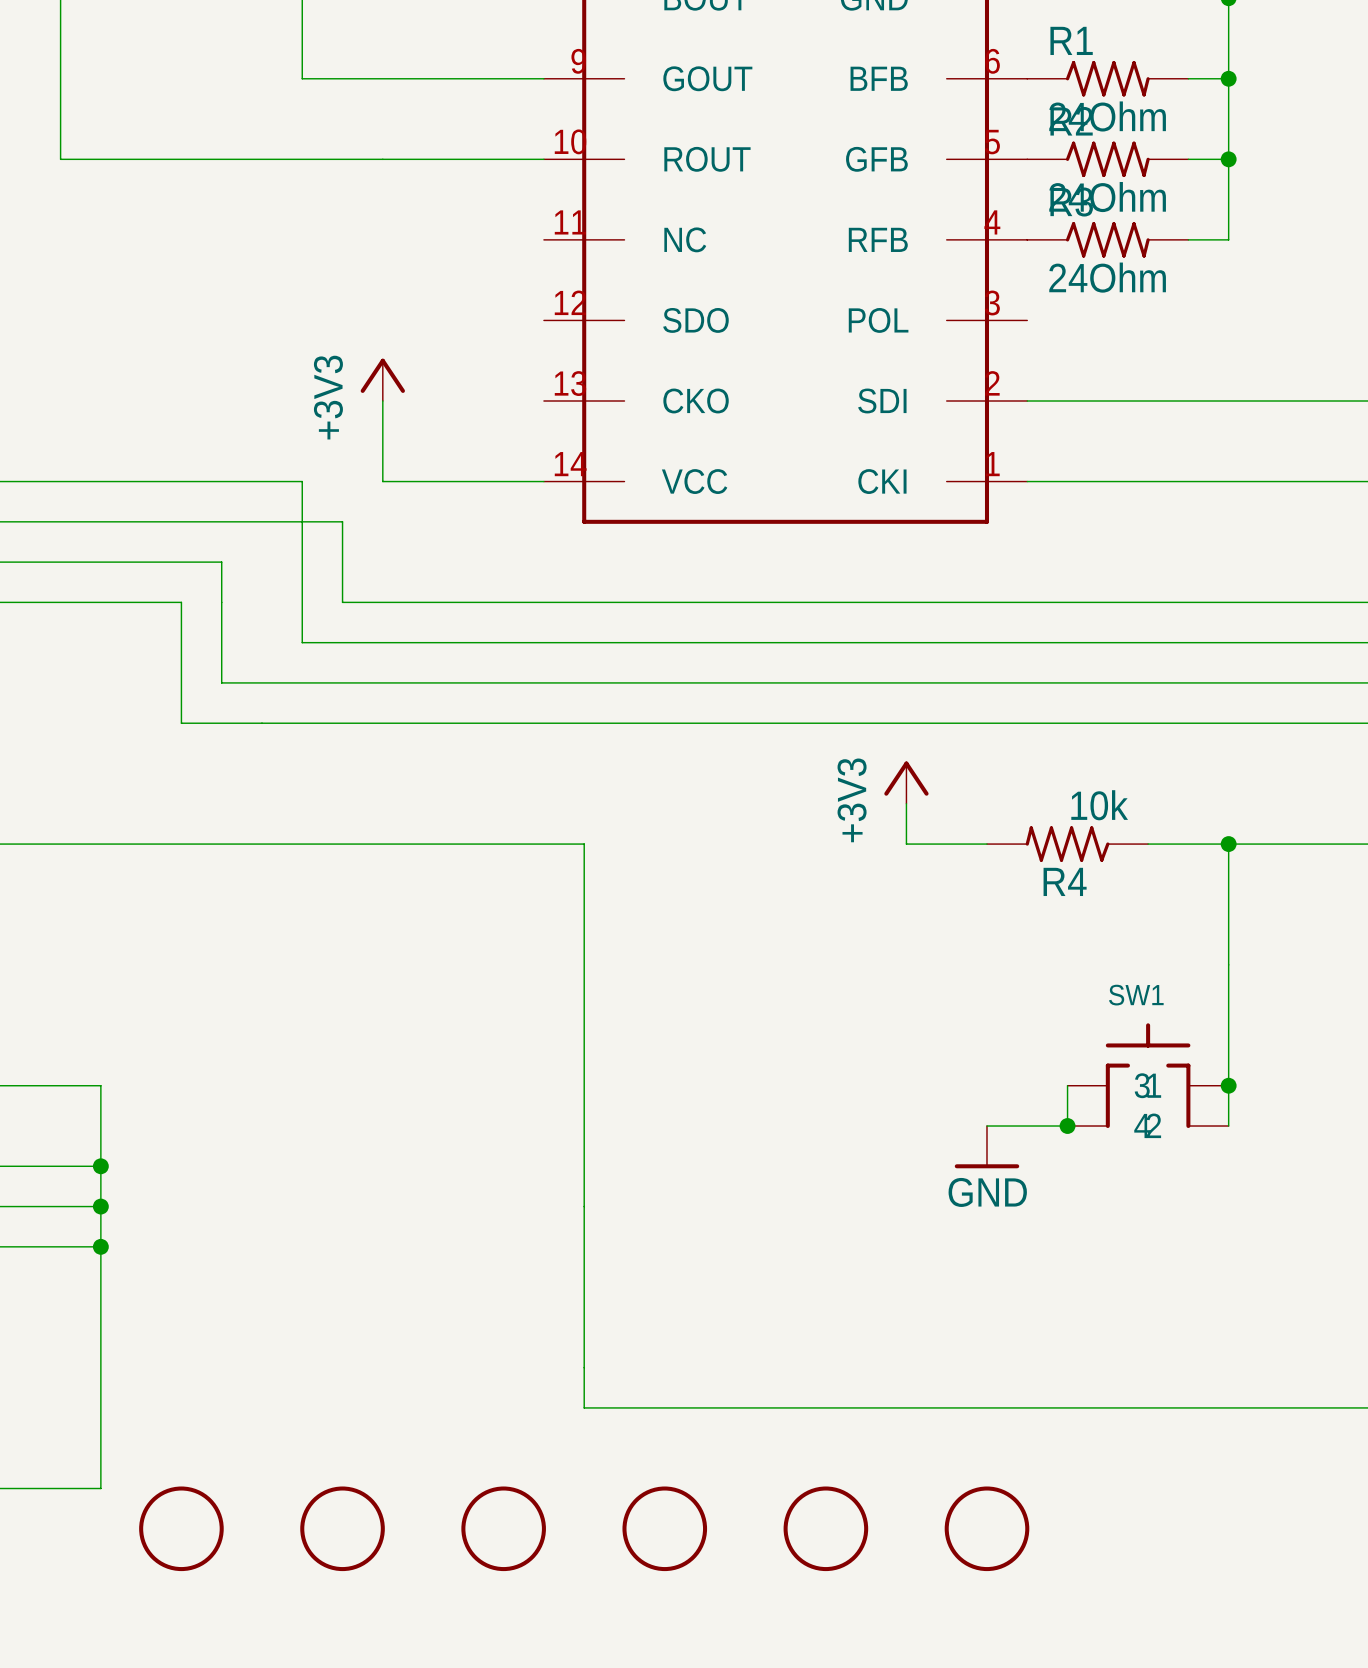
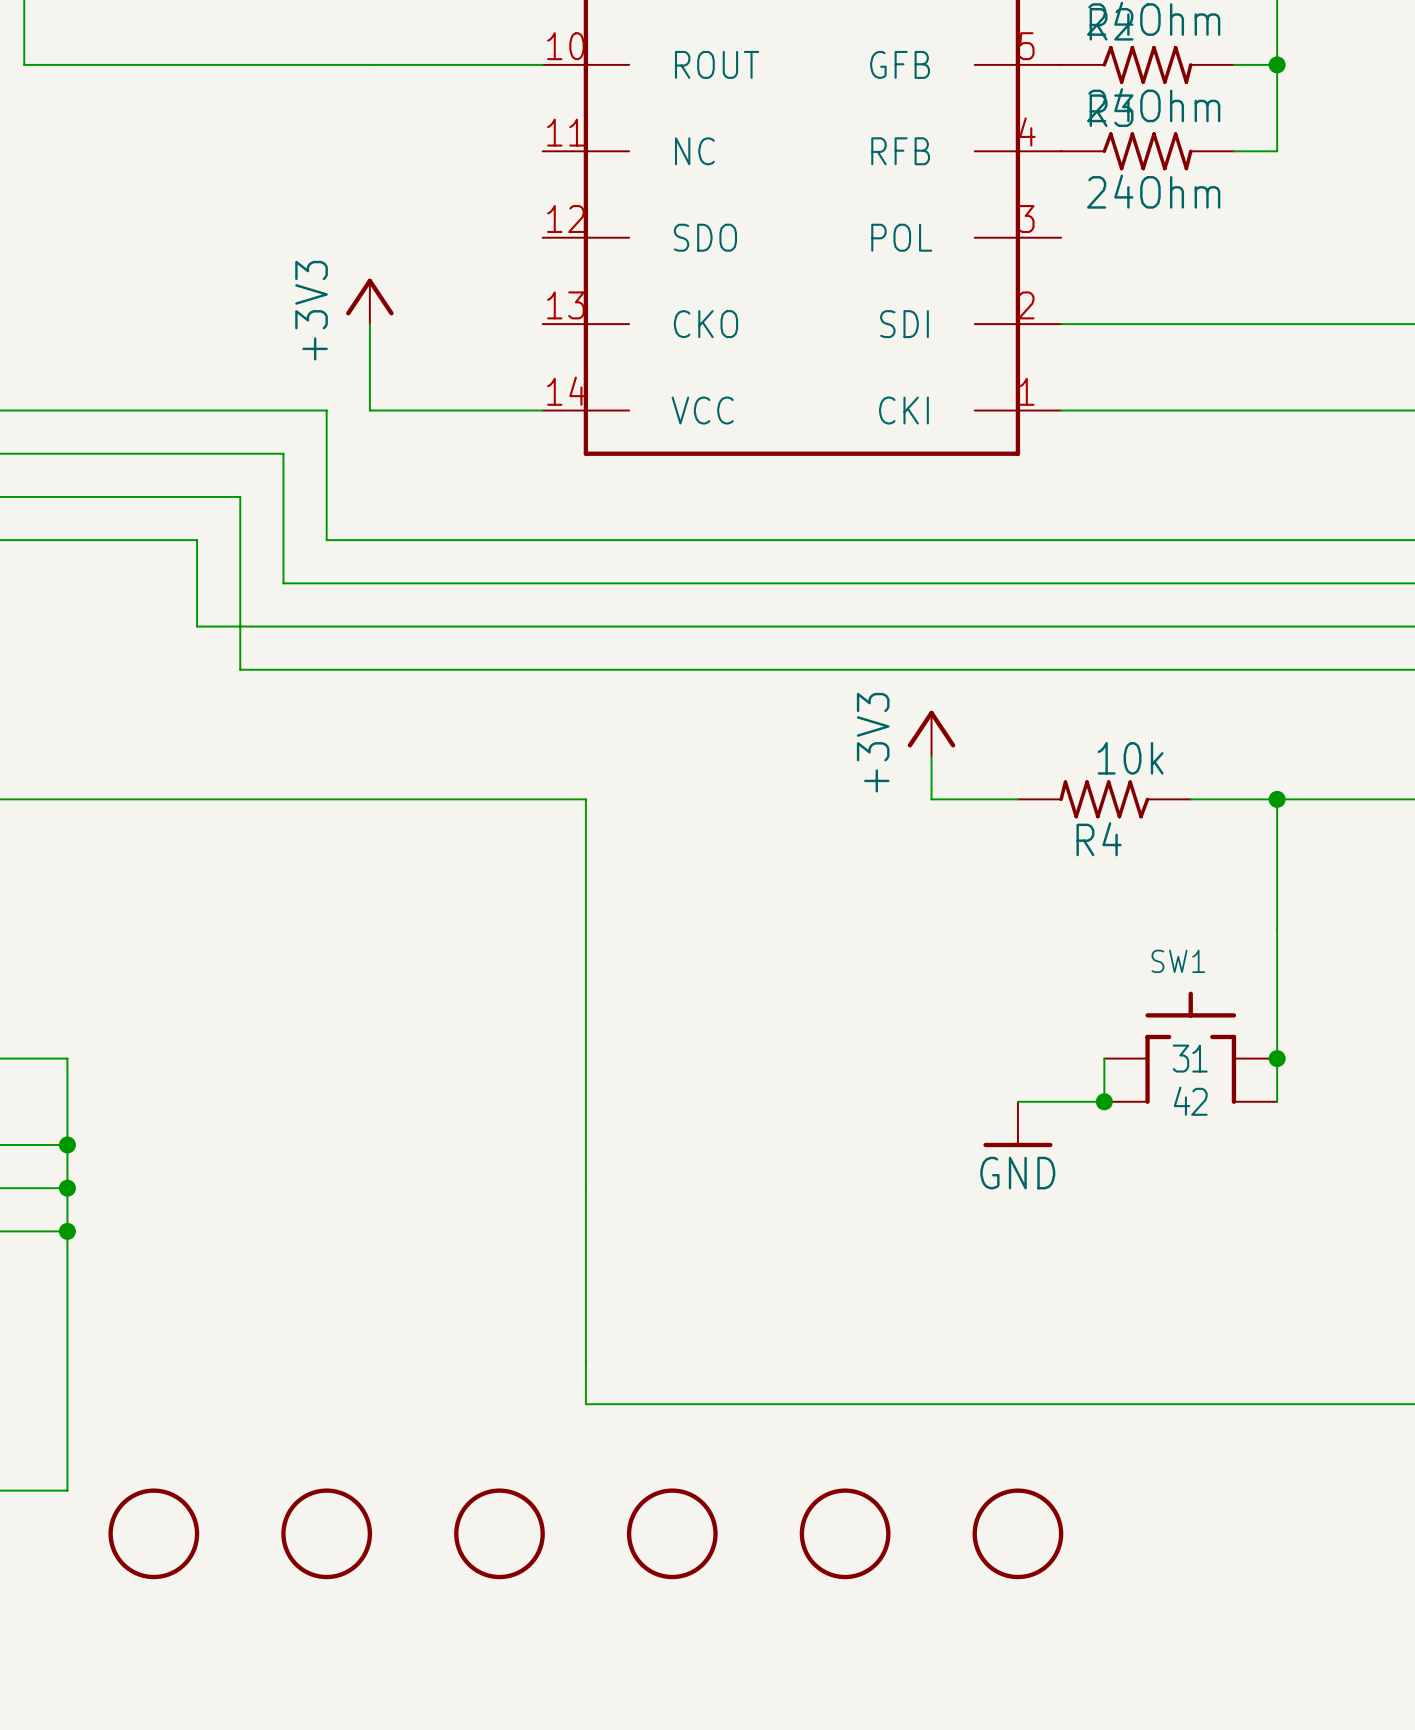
wire: (302, 481) (302, 521) (342, 521) -> (283, 410) (326, 410) (326, 453)
wire: (221, 562) (221, 602) -> (153, 540) (197, 540)
wire: (181, 602) (181, 723) (261, 723) -> (197, 496) (240, 496) (240, 669)

